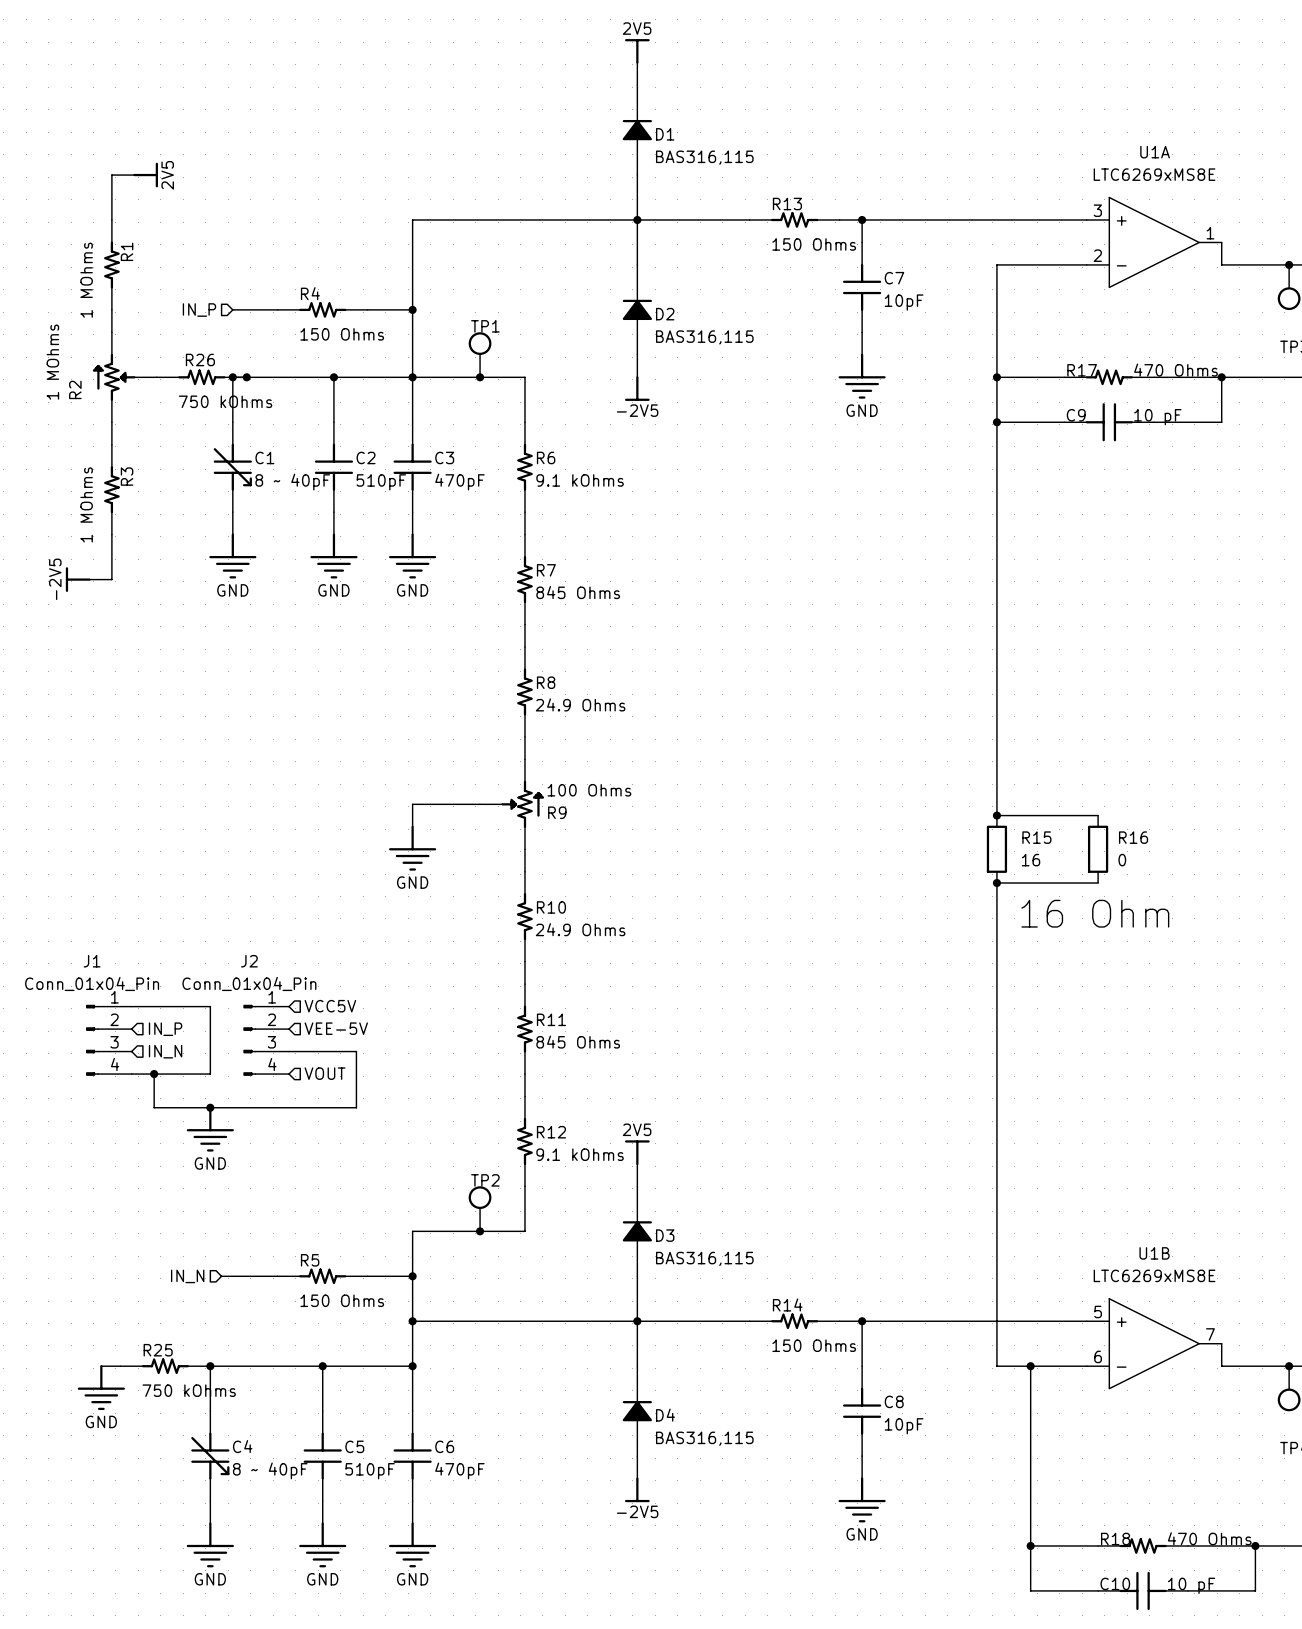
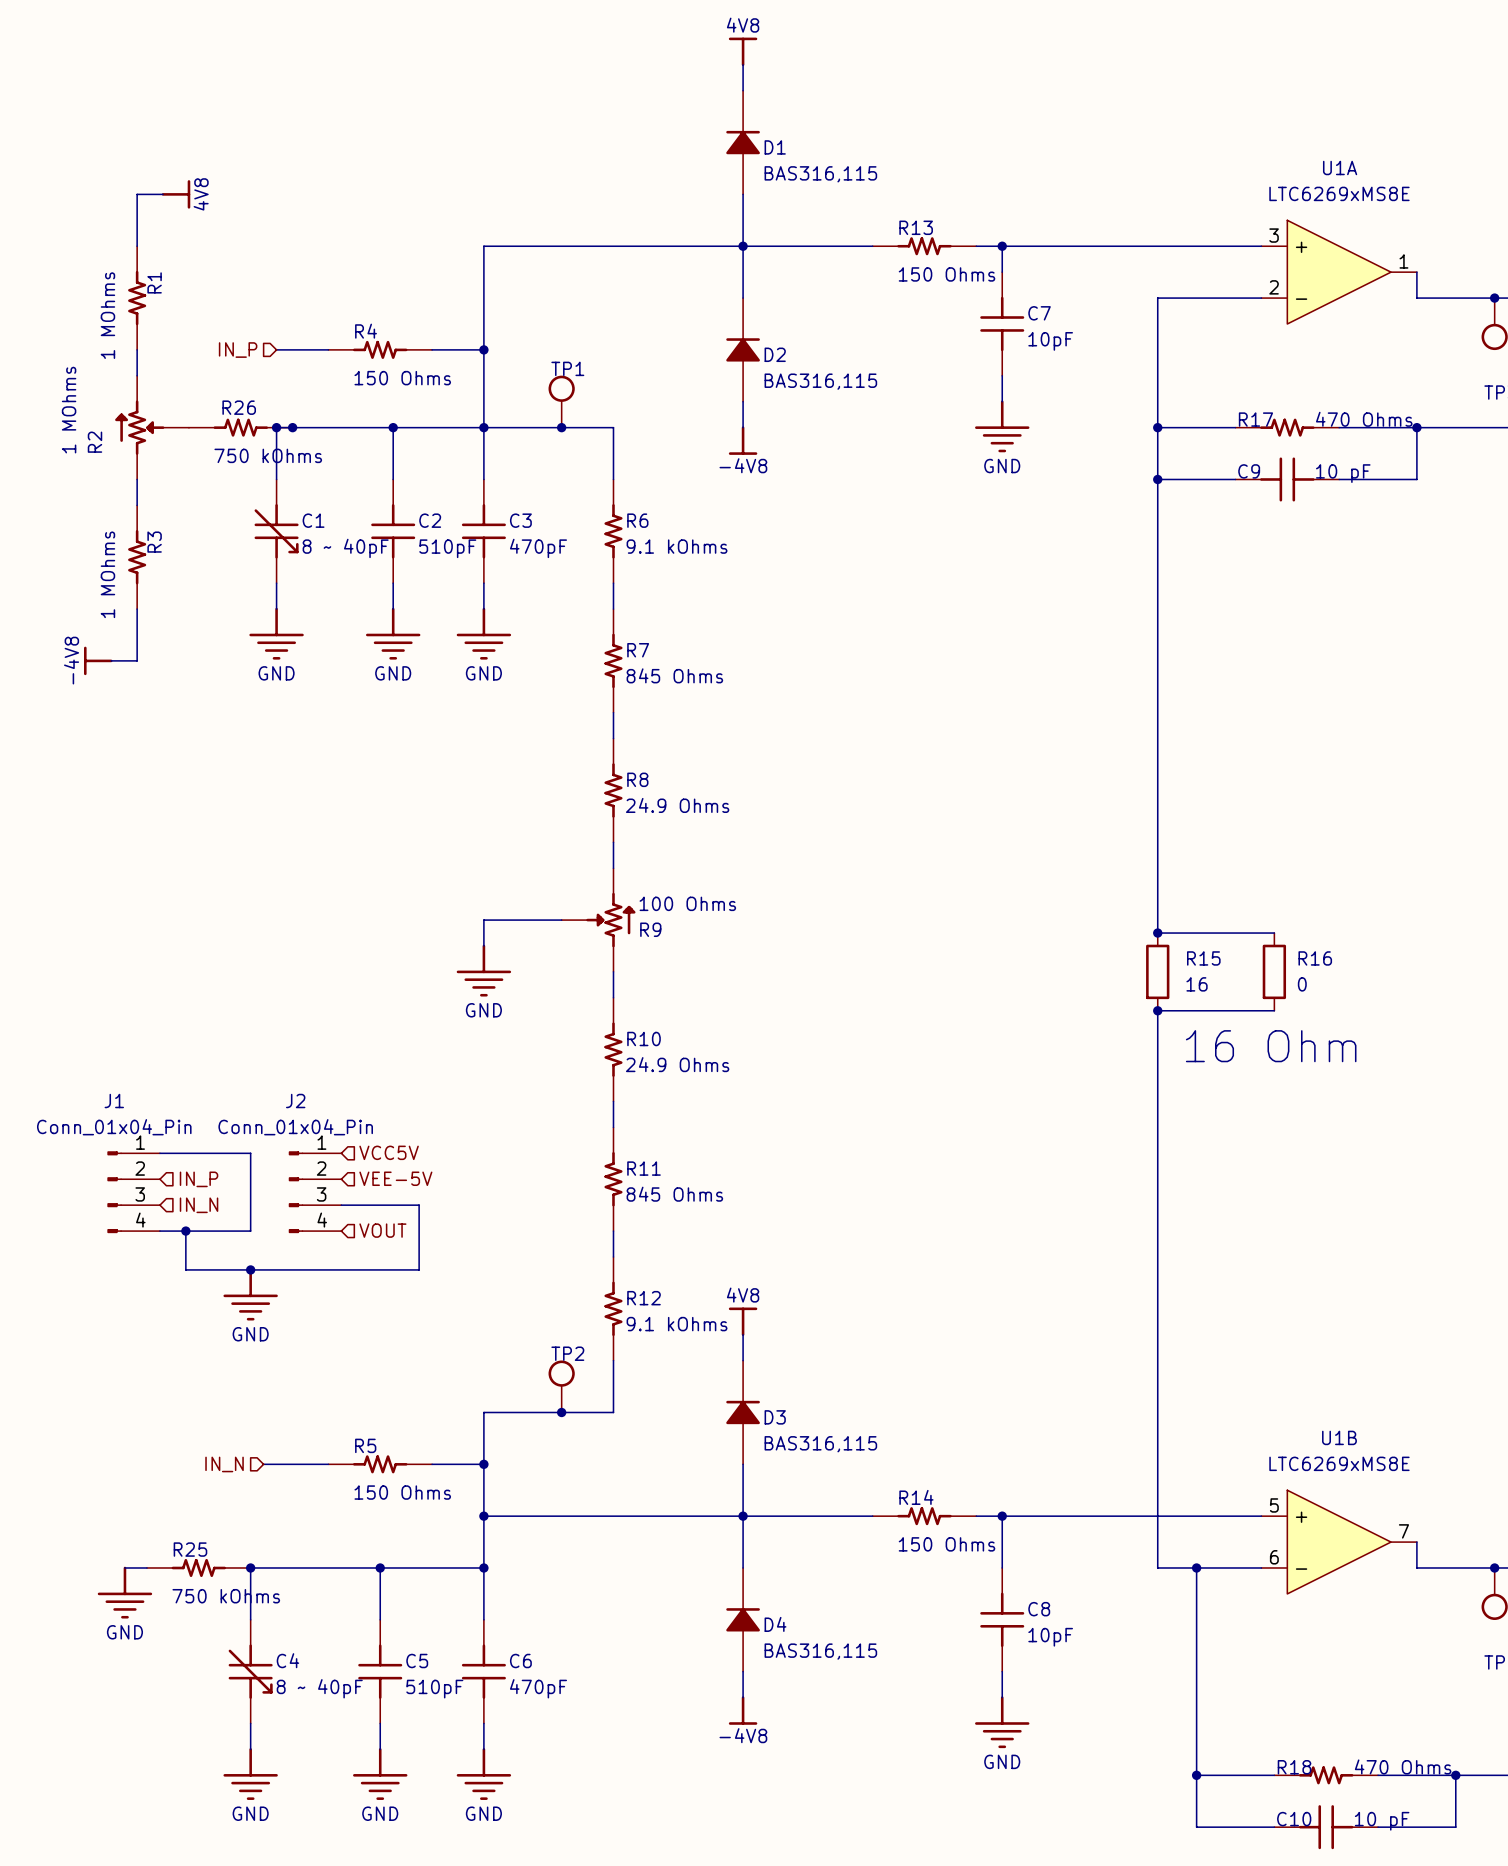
power symbol: 2V5 (637, 51) -> 4V8 (743, 51)
power symbol: 2V5 (145, 175) -> 4V8 (176, 194)
power symbol: -2V5 (637, 388) -> -4V8 (743, 440)
power symbol: -2V5 (78, 579) -> -4V8 (98, 660)
power symbol: 2V5 (637, 1152) -> 4V8 (743, 1321)
power symbol: -2V5 (637, 1489) -> -4V8 (743, 1710)

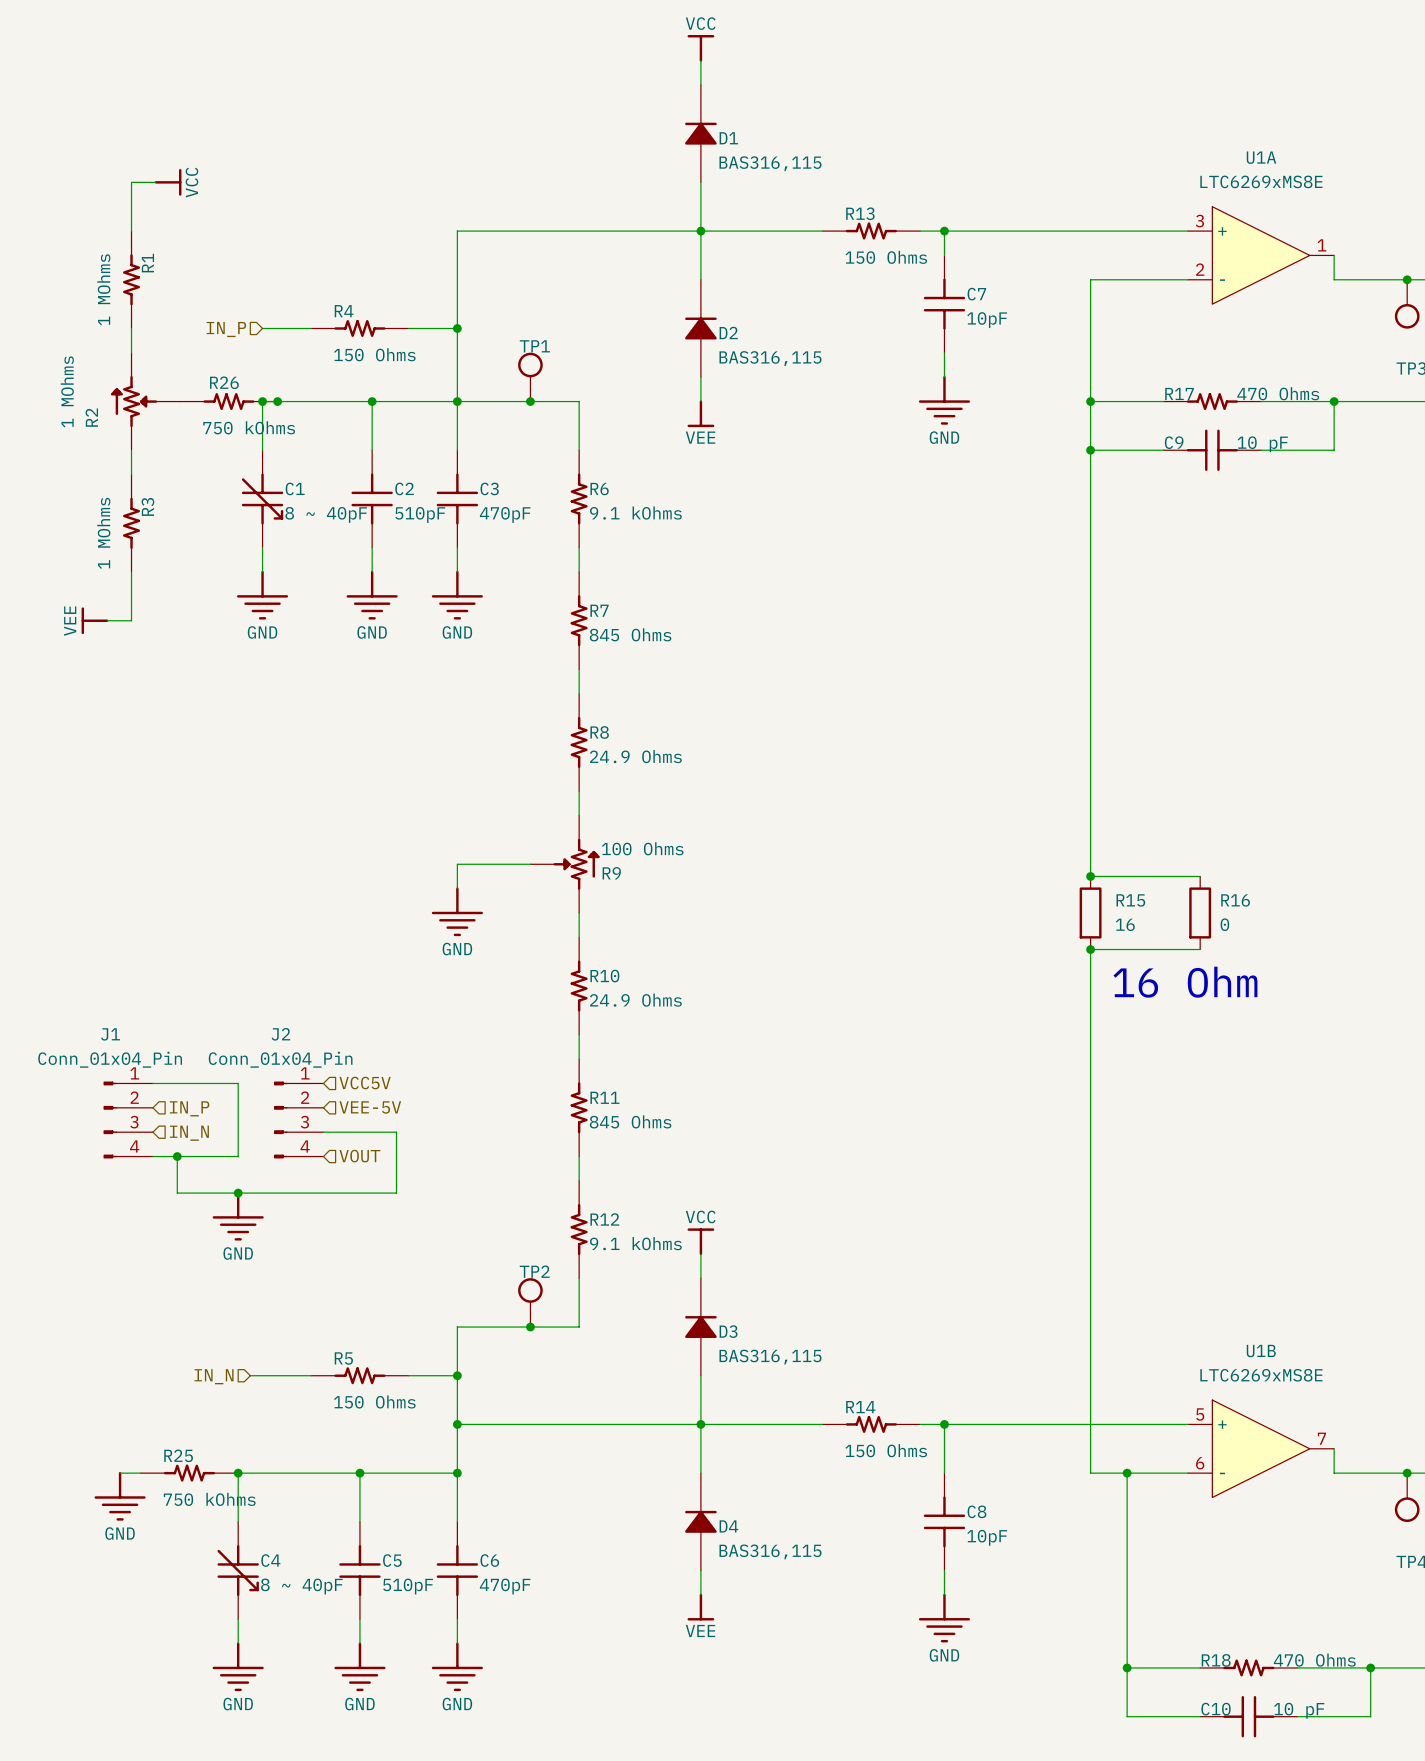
power symbol: 4V8 (743, 51) -> VCC (700, 48)
power symbol: 4V8 (176, 194) -> VCC (168, 182)
power symbol: -4V8 (743, 440) -> VEE (700, 413)
power symbol: -4V8 (98, 660) -> VEE (94, 620)
power symbol: 4V8 (743, 1321) -> VCC (700, 1241)
power symbol: -4V8 (743, 1710) -> VEE (700, 1607)

